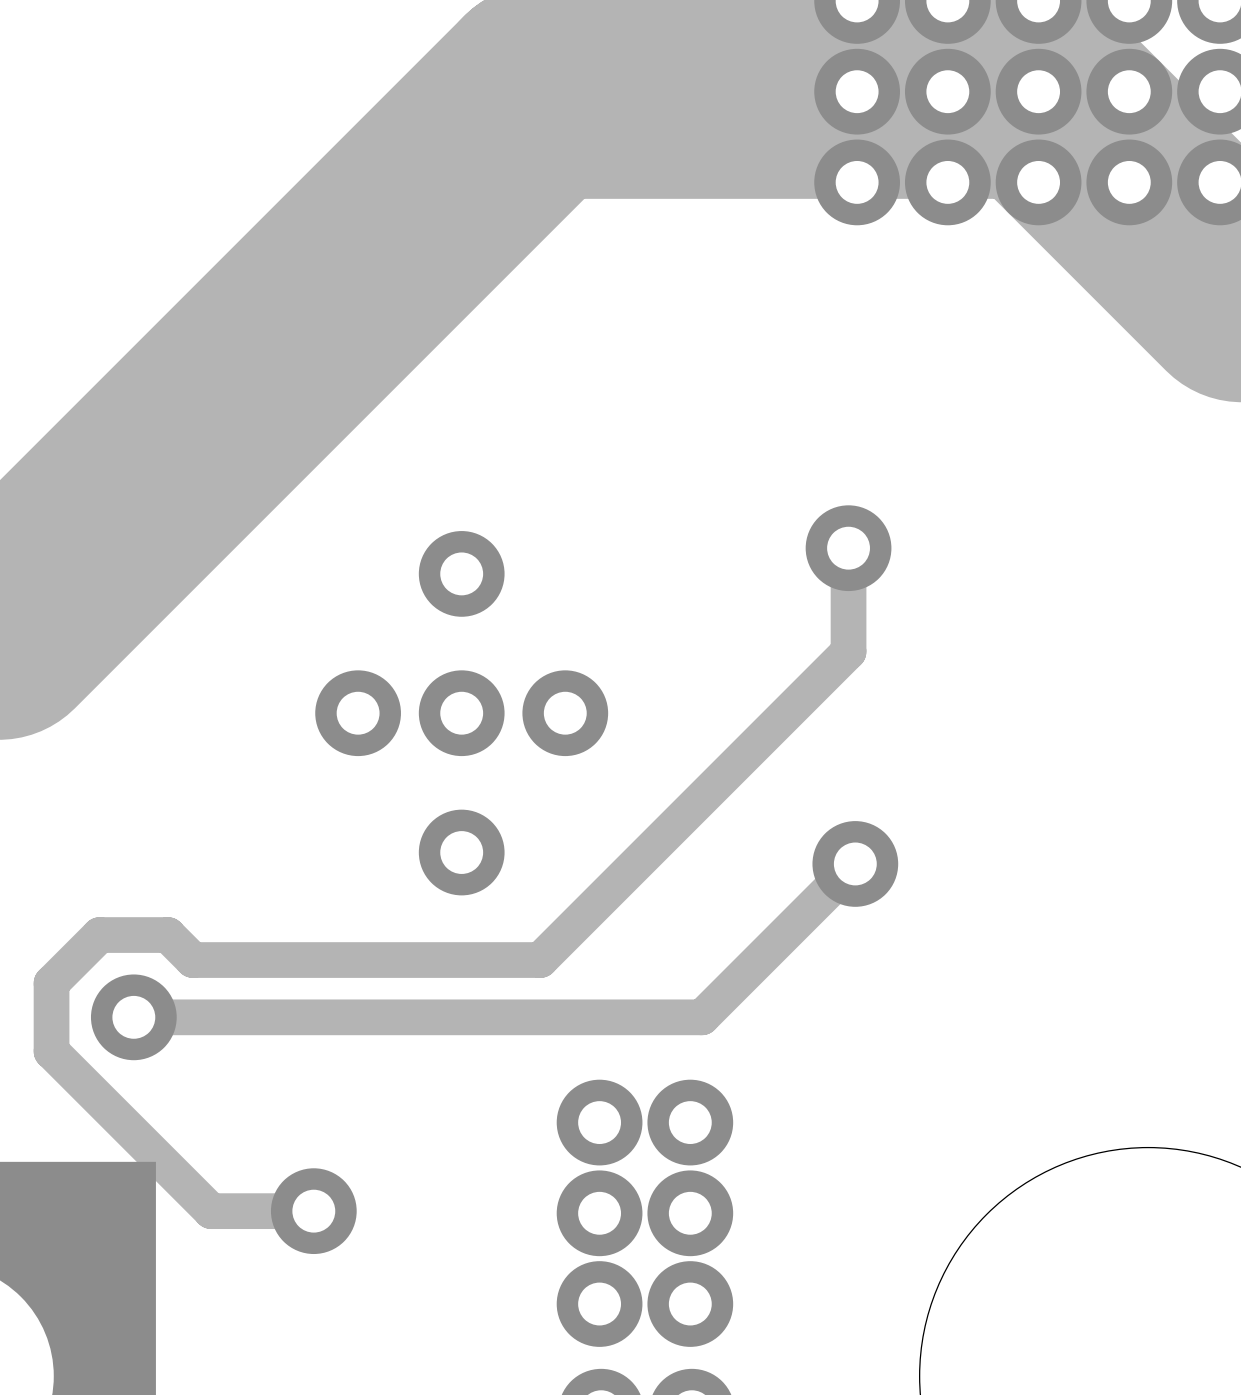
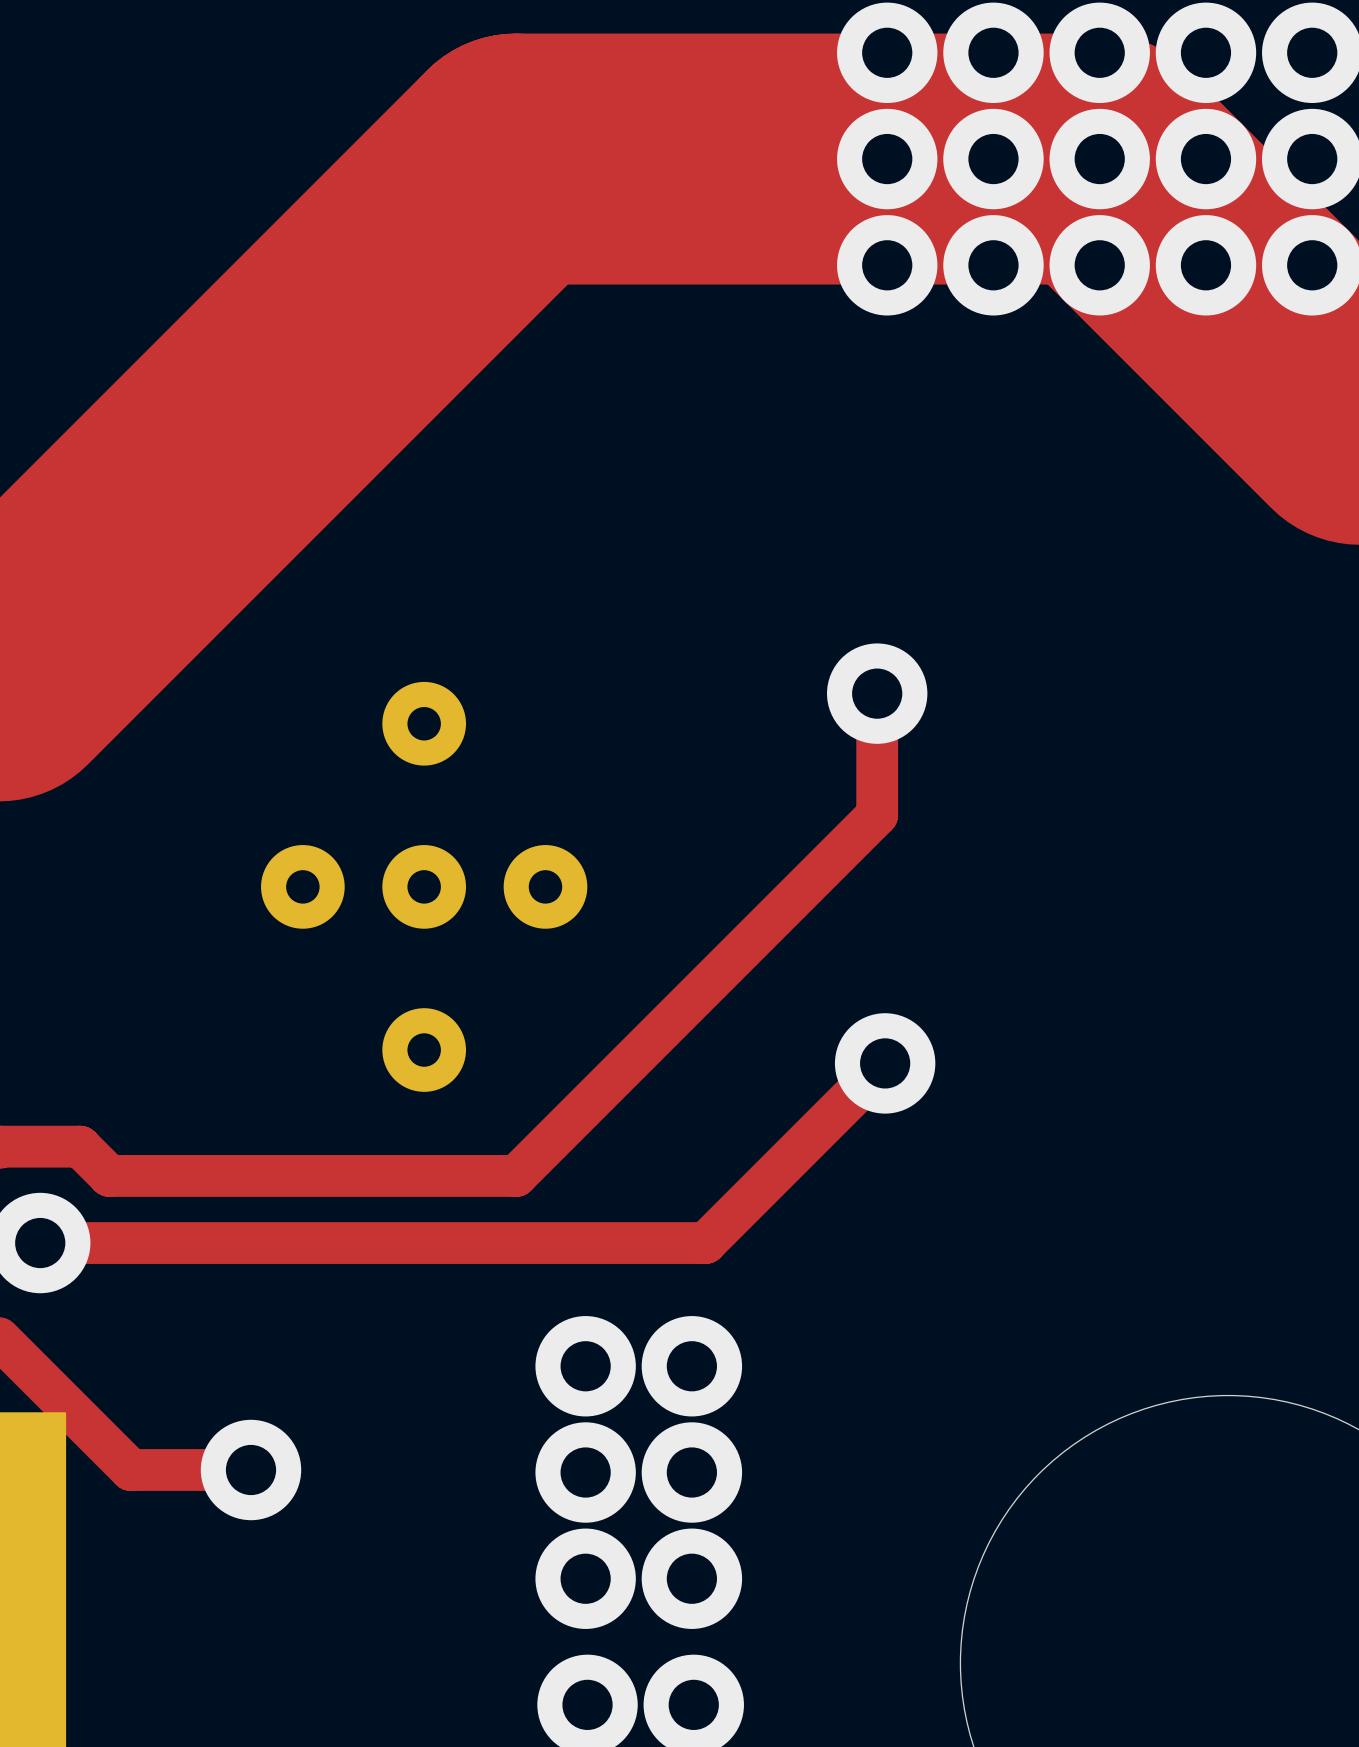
part footprint: [315, 531, 609, 896] -> [261, 681, 588, 1092]

